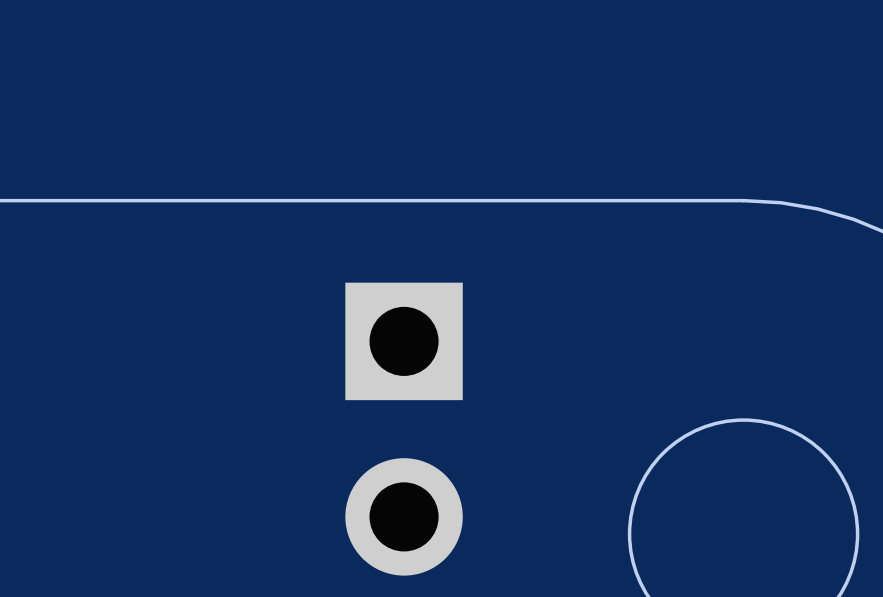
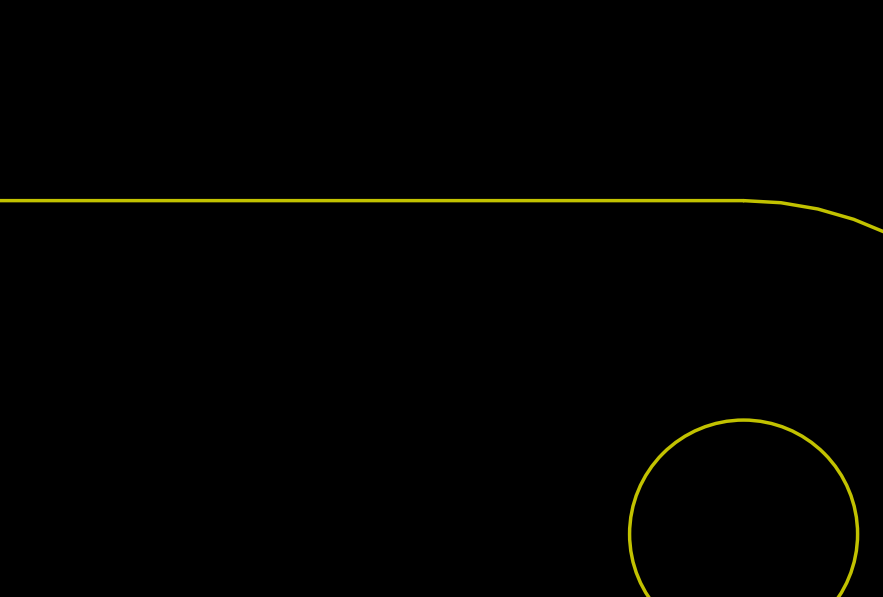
part: (404, 429) -> none

